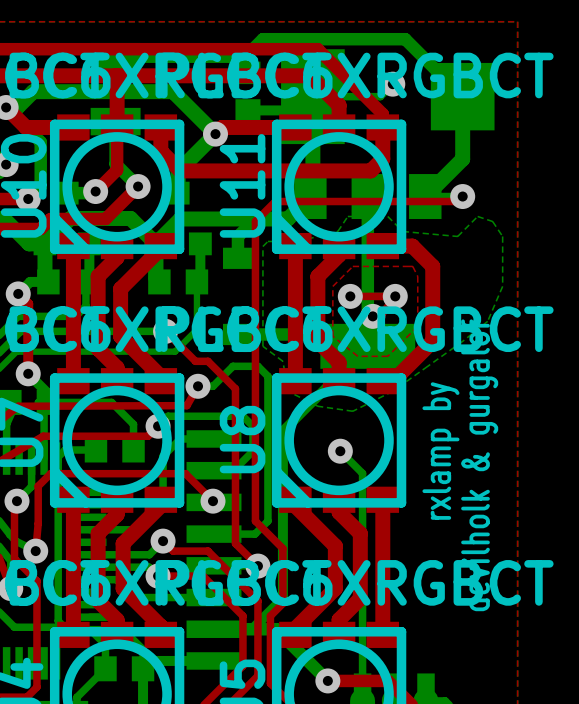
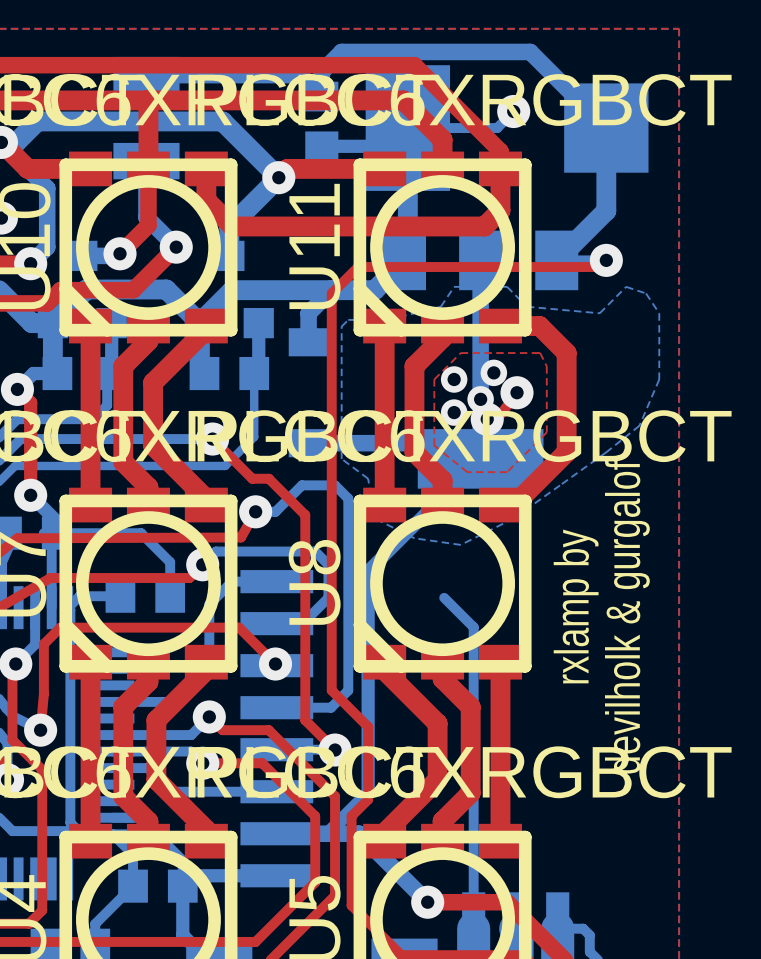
via: none -> (493, 372)
via: none -> (454, 379)
top track: (350, 296) (390, 296) -> none
via: (350, 296) -> none
via: none -> (480, 399)
via: none -> (454, 412)
via: (340, 451) -> none

